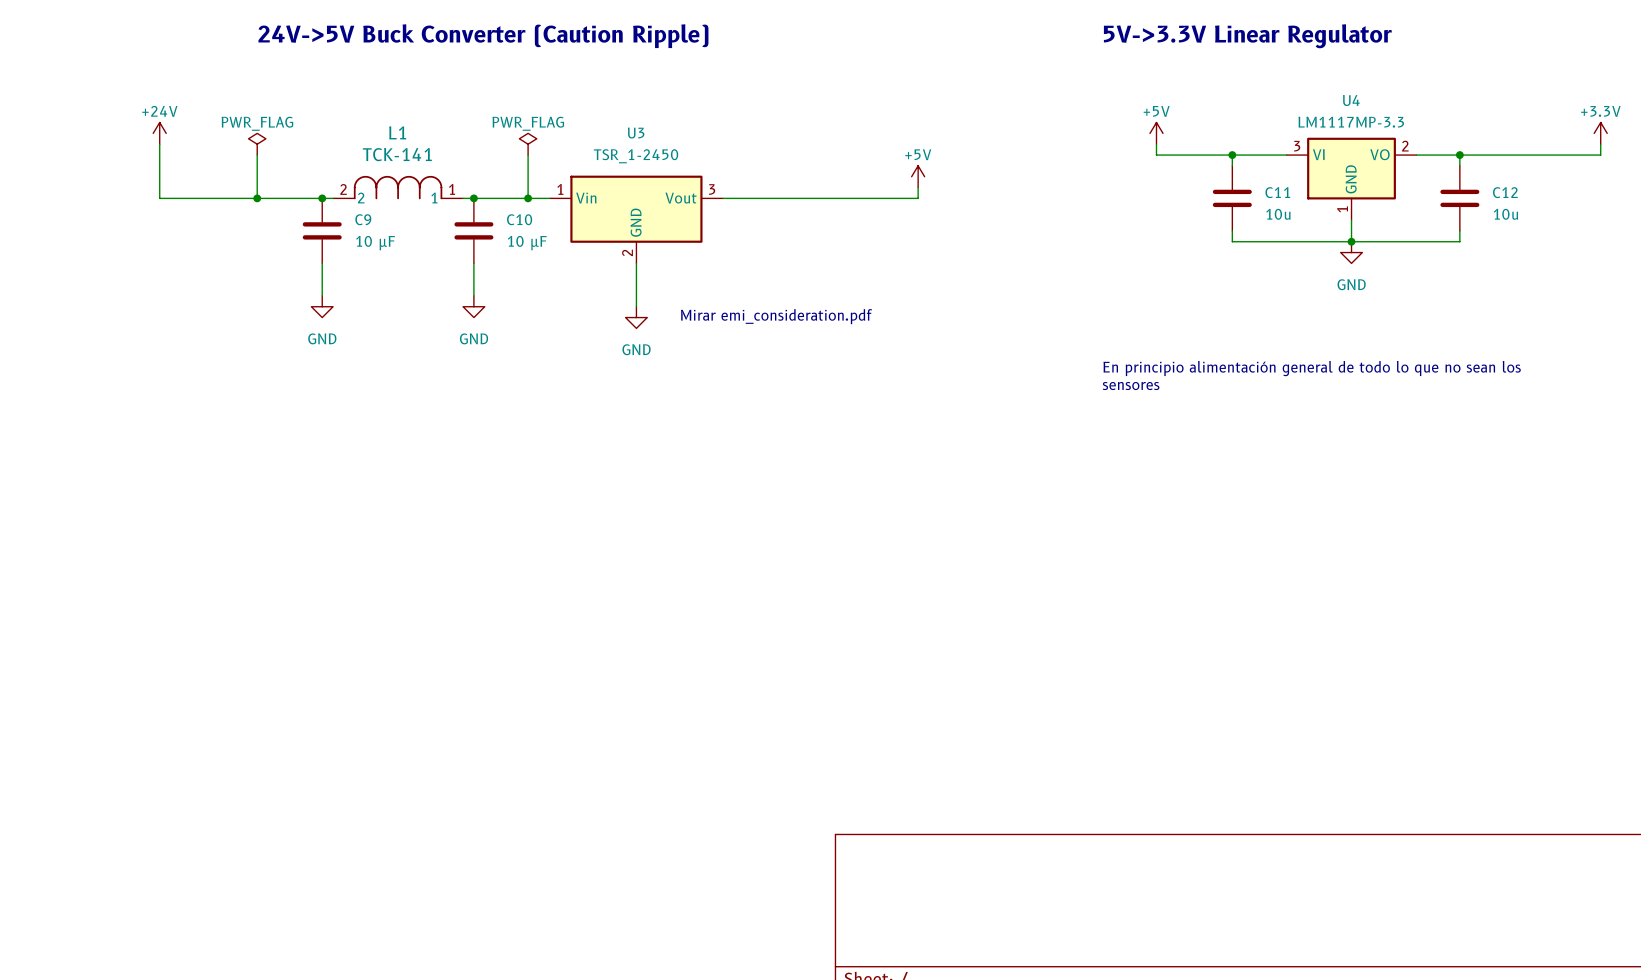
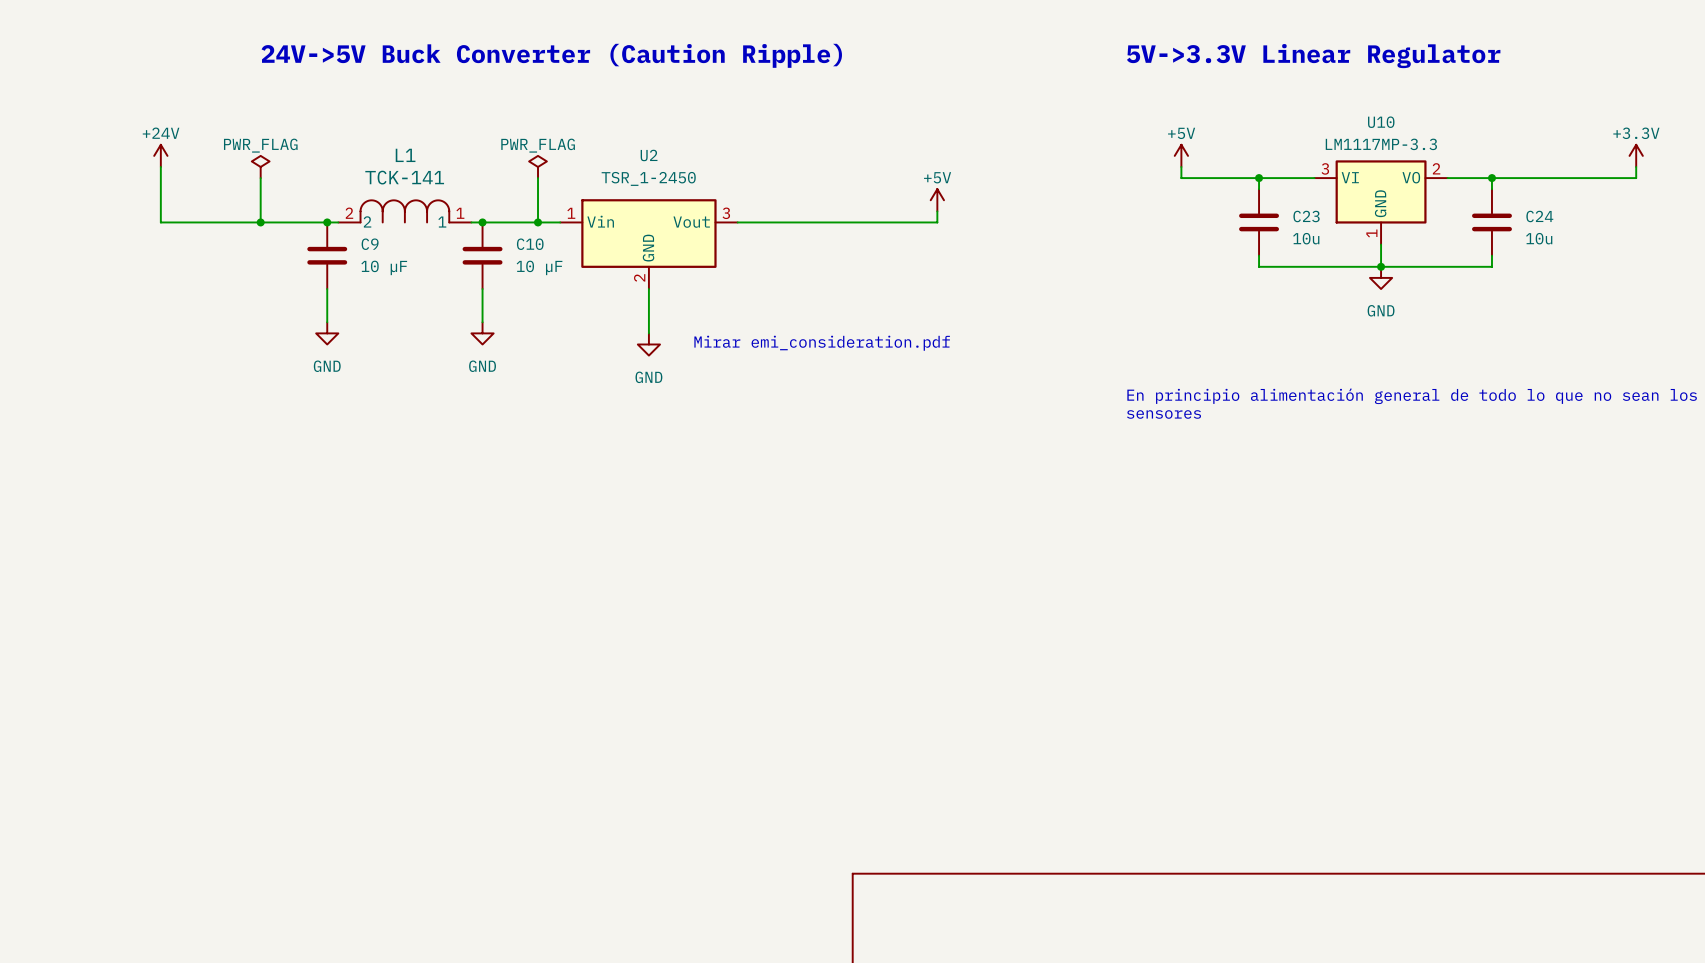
U4 name: U4 (1351, 100) -> U10 (1381, 122)
U3 name: U3 (636, 133) -> U2 (649, 155)
C11 name: C11 (1277, 192) -> C23 (1306, 216)
C12 name: C12 (1505, 192) -> C24 (1539, 216)

